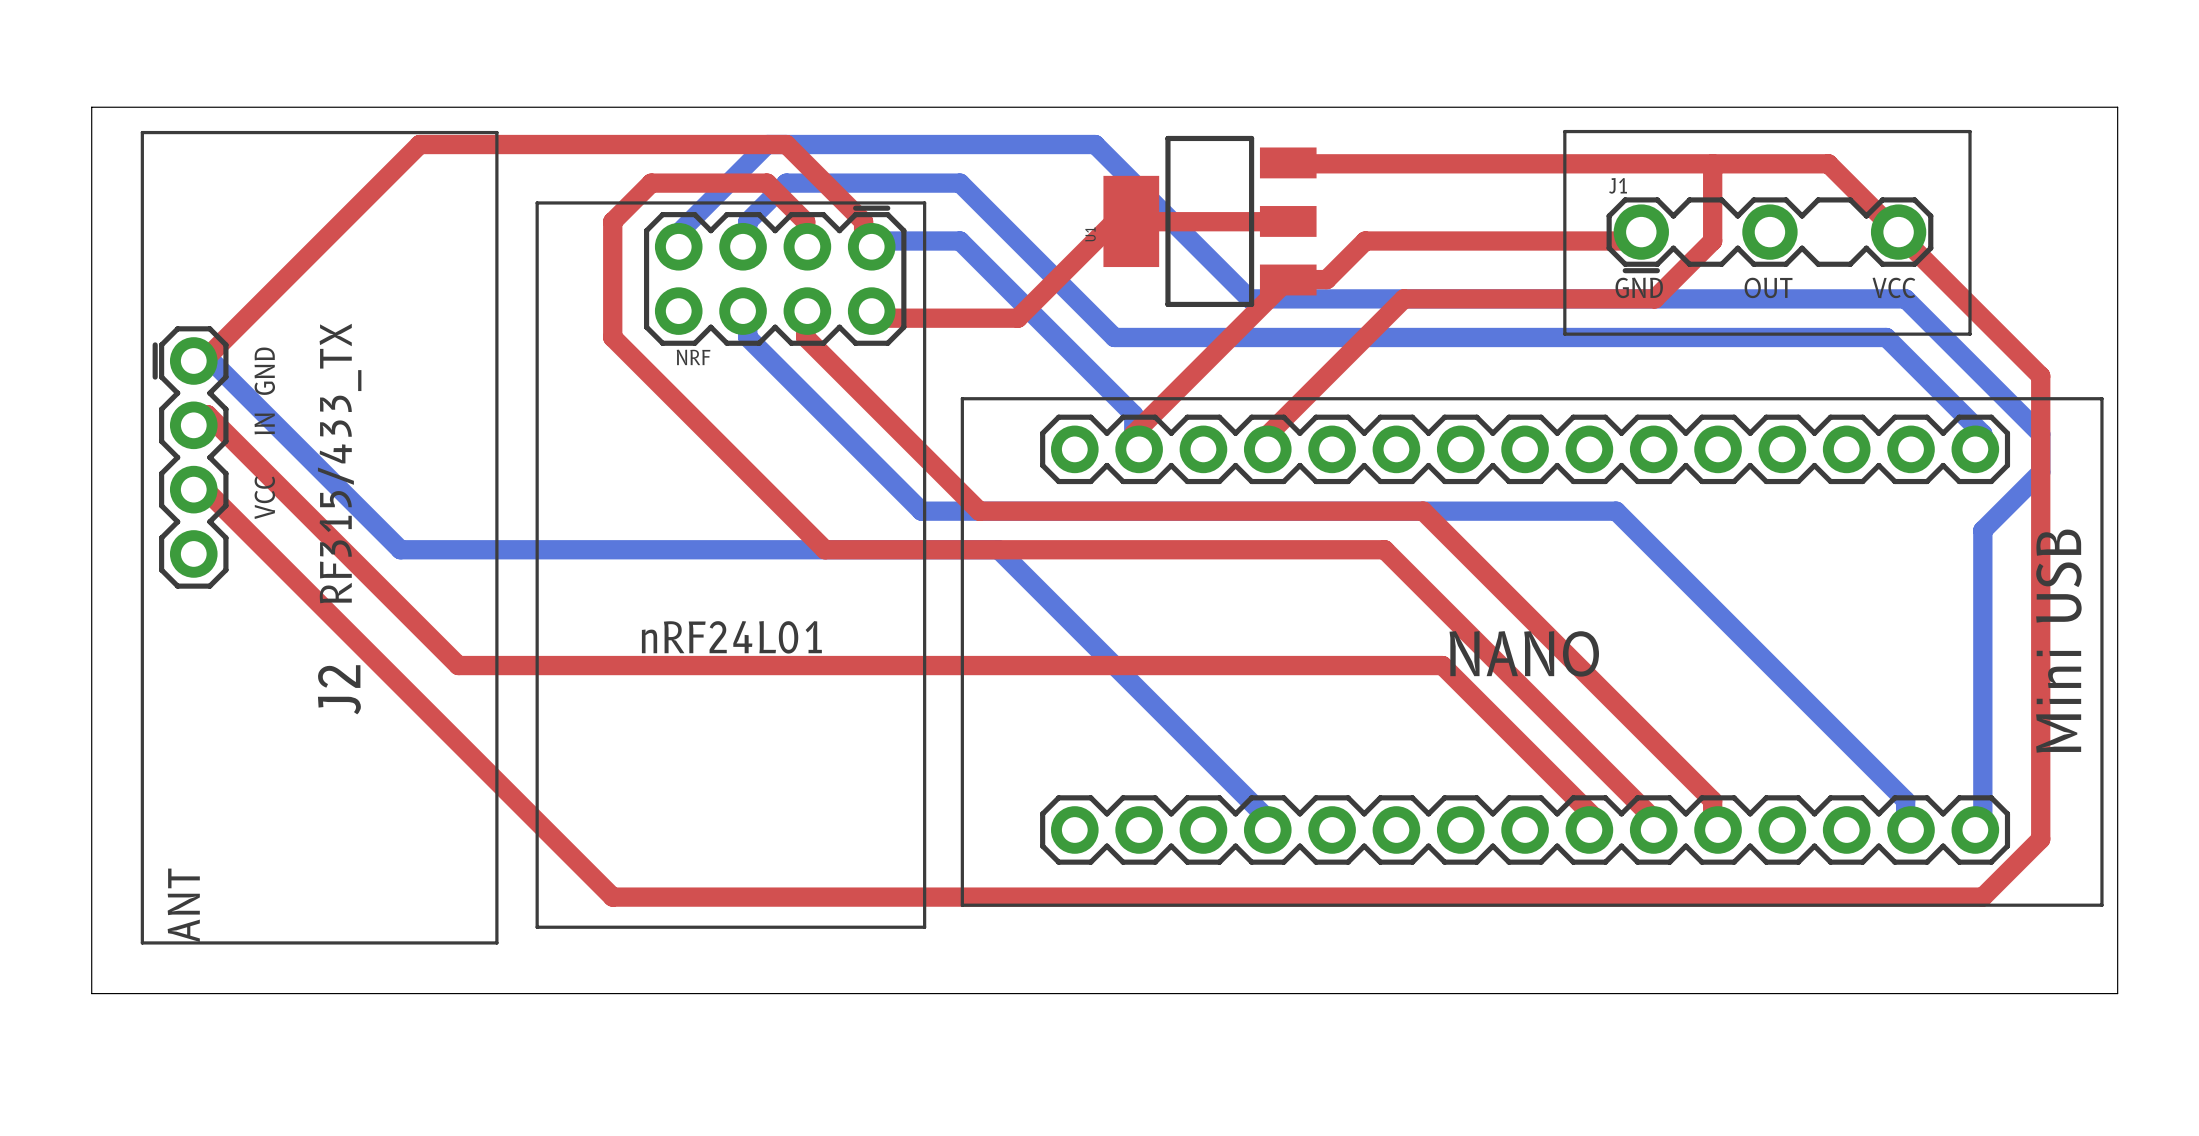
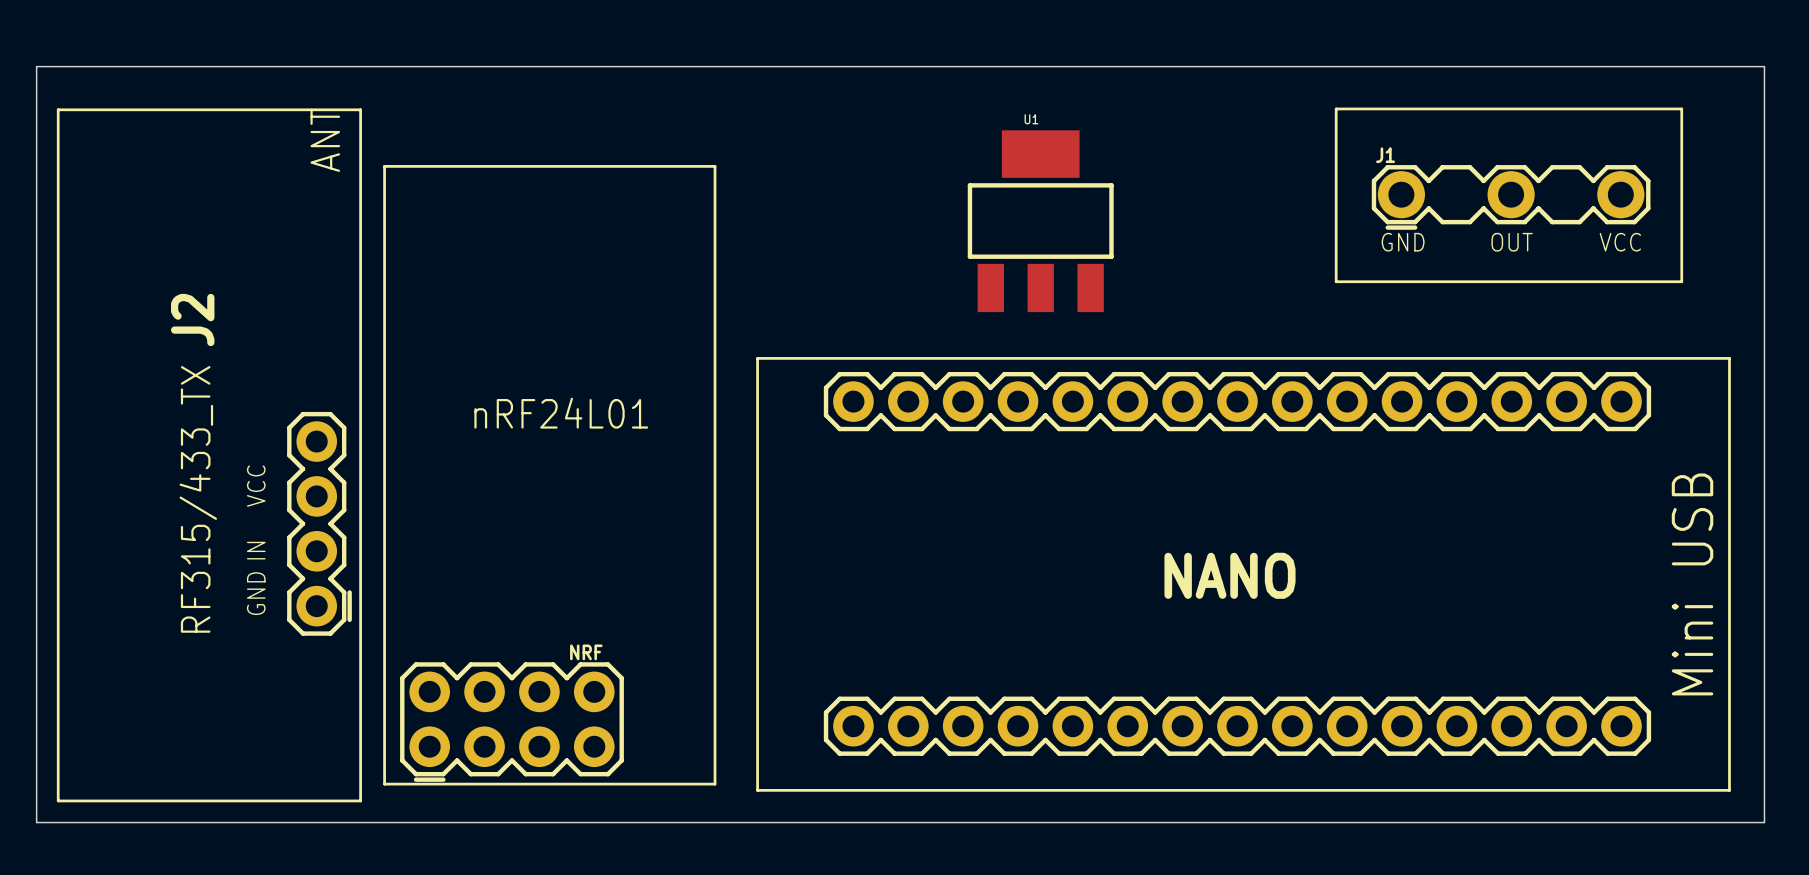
J2 footprint: [140, 130, 499, 945] -> [56, 108, 362, 803]
top track: (1288, 162) (1828, 163) (2040, 376) (2040, 839) (1982, 897) (612, 897) (207, 491) (193, 489) -> none
top track: (1712, 163) (1712, 241) (1654, 298) (1403, 298) (1268, 433) (1267, 449) -> none
U1 rotation: 0° (1210, 221) -> 90° clockwise (1040, 221)
top track: (1288, 221) (1114, 221) (1017, 318) (882, 318) (871, 311) -> none
top track: (1641, 232) (1635, 241) (1365, 241) (1326, 279) (1288, 279) -> none
J1 position: (1767, 232) -> (1508, 195)
bottom track: (678, 246) (670, 241) (767, 144) (1095, 144) (1249, 298) (1905, 298) (2040, 433) (2040, 472) (1982, 530) (1982, 819) (1975, 829) -> none
bottom track: (743, 246) (747, 241) (747, 221) (786, 183) (960, 183) (1114, 337) (1886, 337) (1982, 433) (1975, 449) -> none
top track: (807, 246) (805, 221) (767, 183) (651, 183) (612, 221) (612, 337) (825, 549) (1384, 549) (1654, 819) (1653, 829) -> none
top track: (871, 246) (863, 241) (863, 221) (786, 144) (419, 144) (207, 356) (193, 360) -> none
bottom track: (871, 246) (882, 241) (960, 241) (1133, 414) (1133, 433) (1139, 449) -> none
top track: (1288, 279) (1133, 433) (1139, 449) -> none
bottom track: (743, 311) (747, 318) (747, 337) (921, 511) (1616, 511) (1905, 800) (1905, 819) (1911, 829) -> none
top track: (807, 311) (805, 337) (979, 511) (1423, 511) (1712, 800) (1712, 819) (1718, 829) -> none
bottom track: (193, 360) (207, 356) (400, 549) (998, 549) (1268, 819) (1267, 829) -> none
top track: (193, 425) (207, 414) (458, 665) (1442, 665) (1596, 819) (1589, 829) -> none
NRF: (730, 565) -> none
NRF: none -> (549, 475)
NANO position: (1532, 651) -> (1243, 574)
J2 name position: J2 (339, 689) -> J2 (192, 320)

